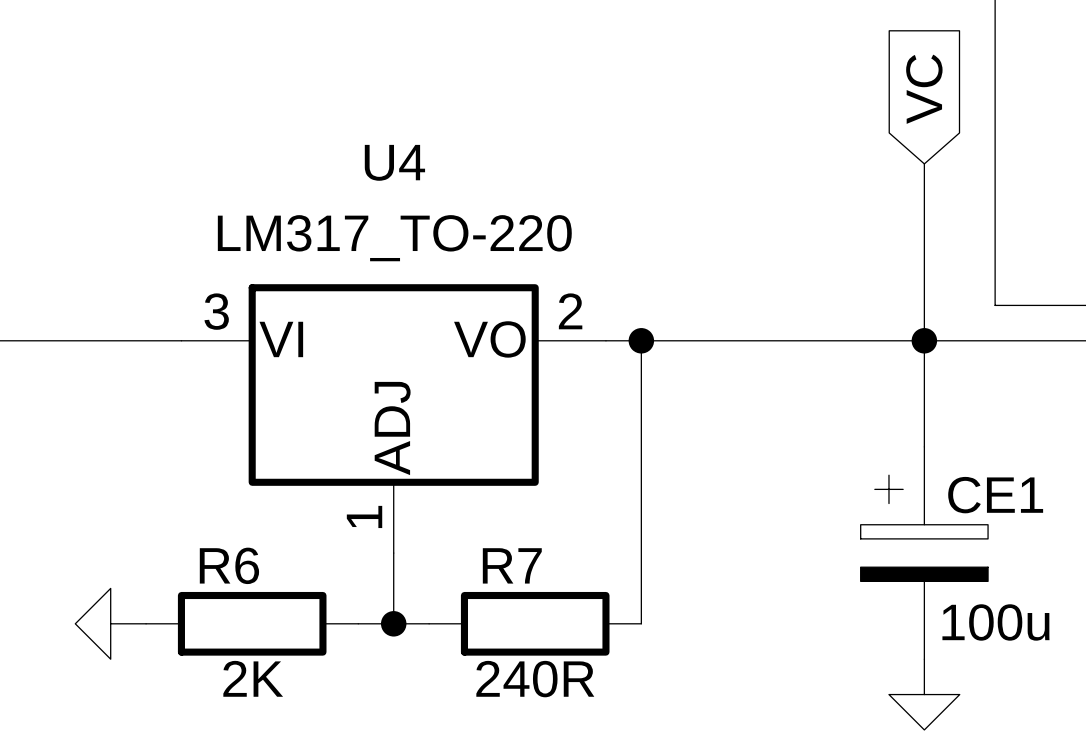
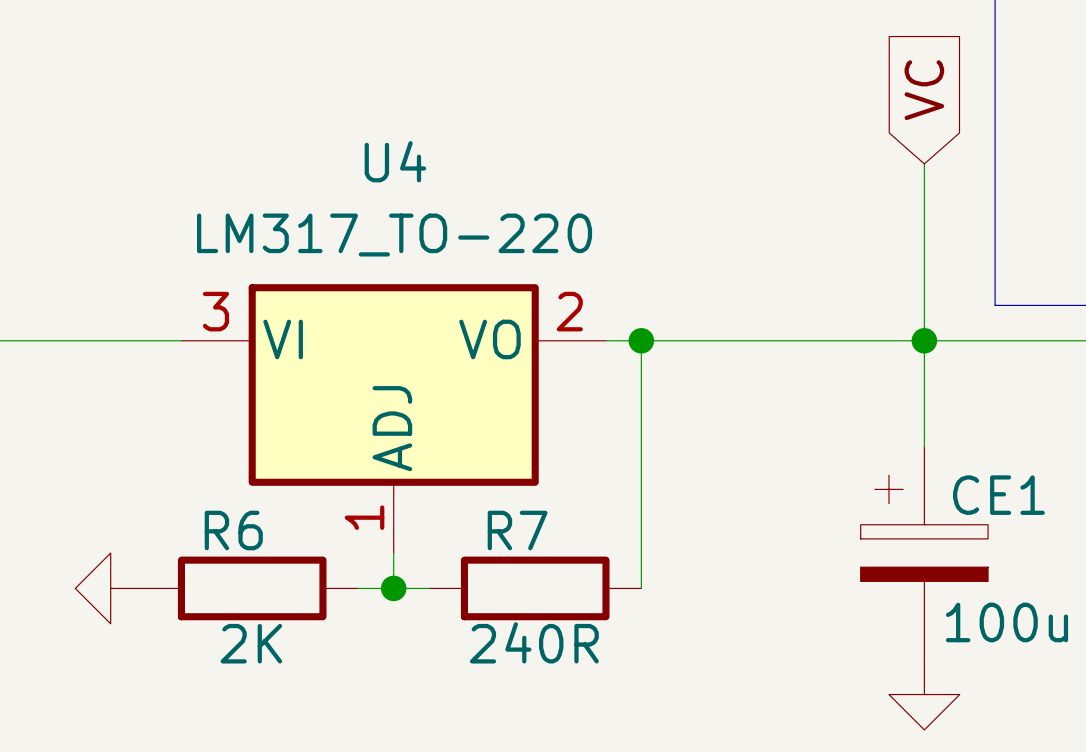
wire: (393, 588) (393, 623) -> none
wire: (641, 588) (641, 623) -> none
power symbol position: (110, 623) -> (110, 588)
R6 position: (252, 623) -> (252, 588)
wire: (358, 623) (429, 623) -> (358, 588) (429, 588)
junction position: (393, 623) -> (393, 588)
R7 position: (535, 623) -> (535, 588)

